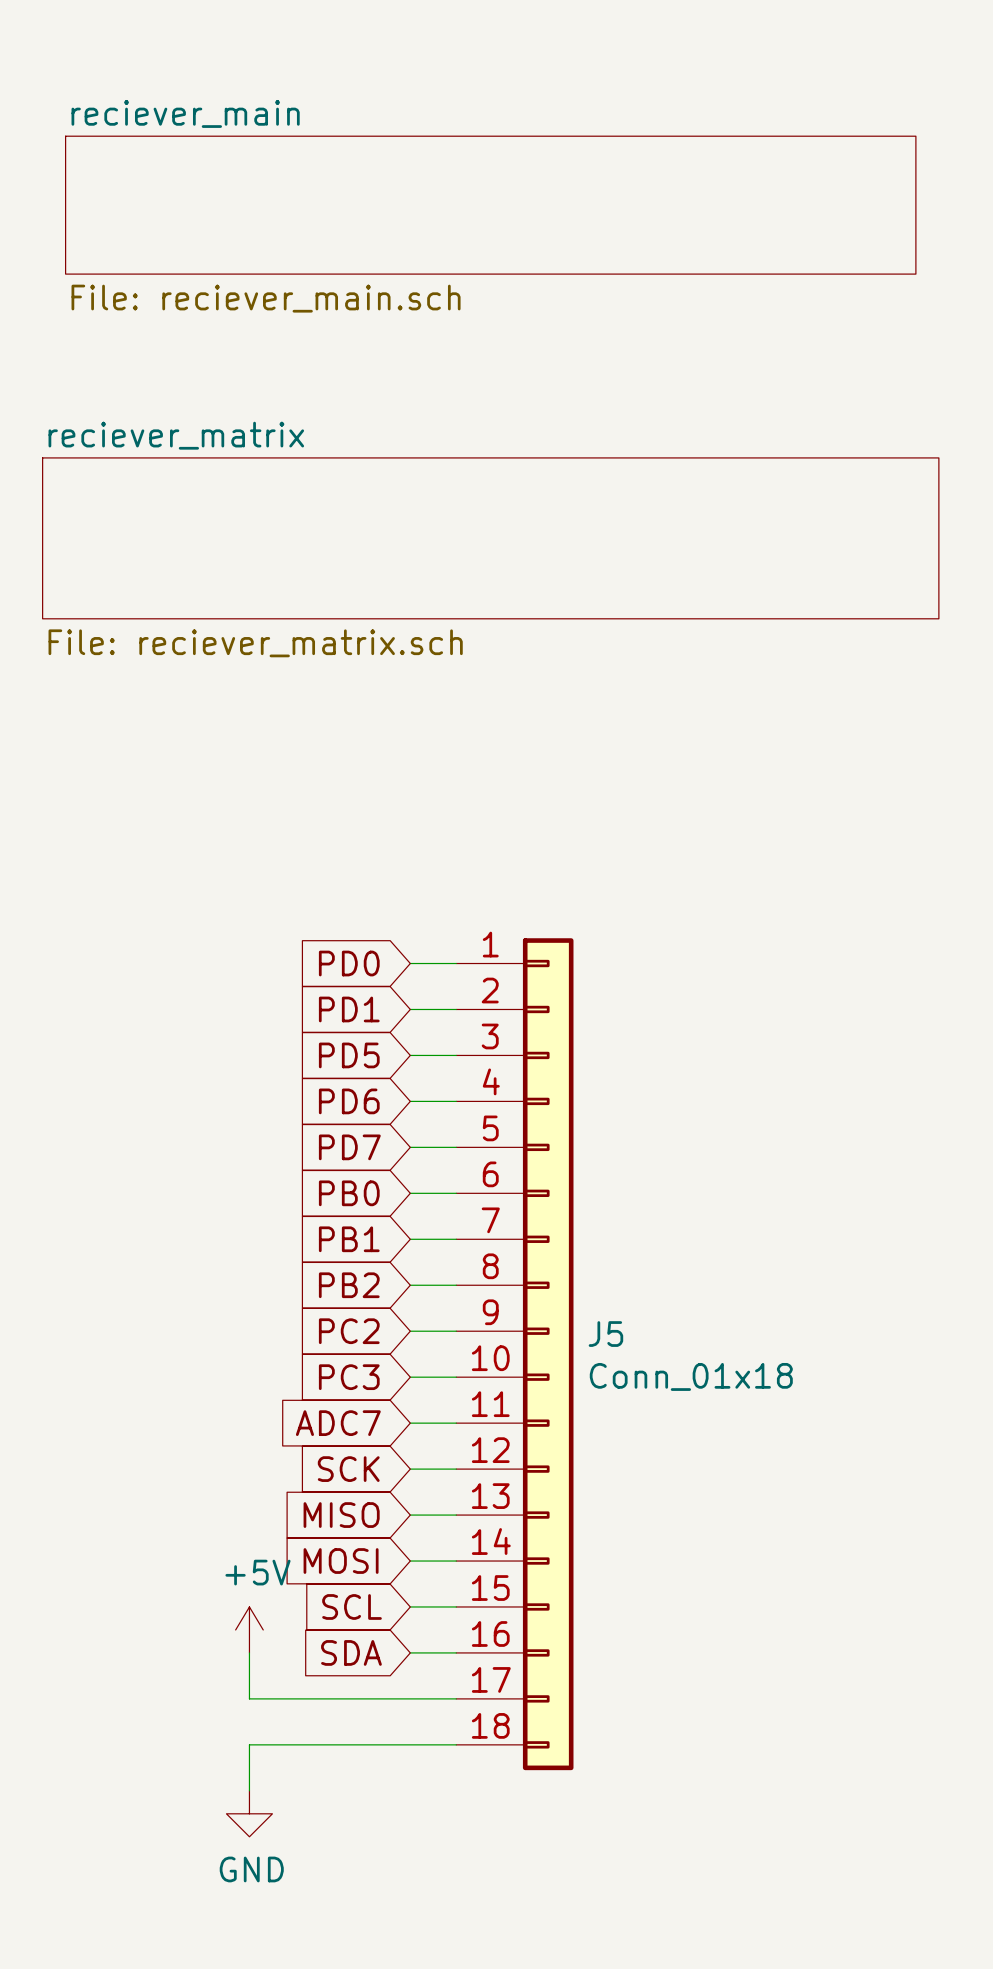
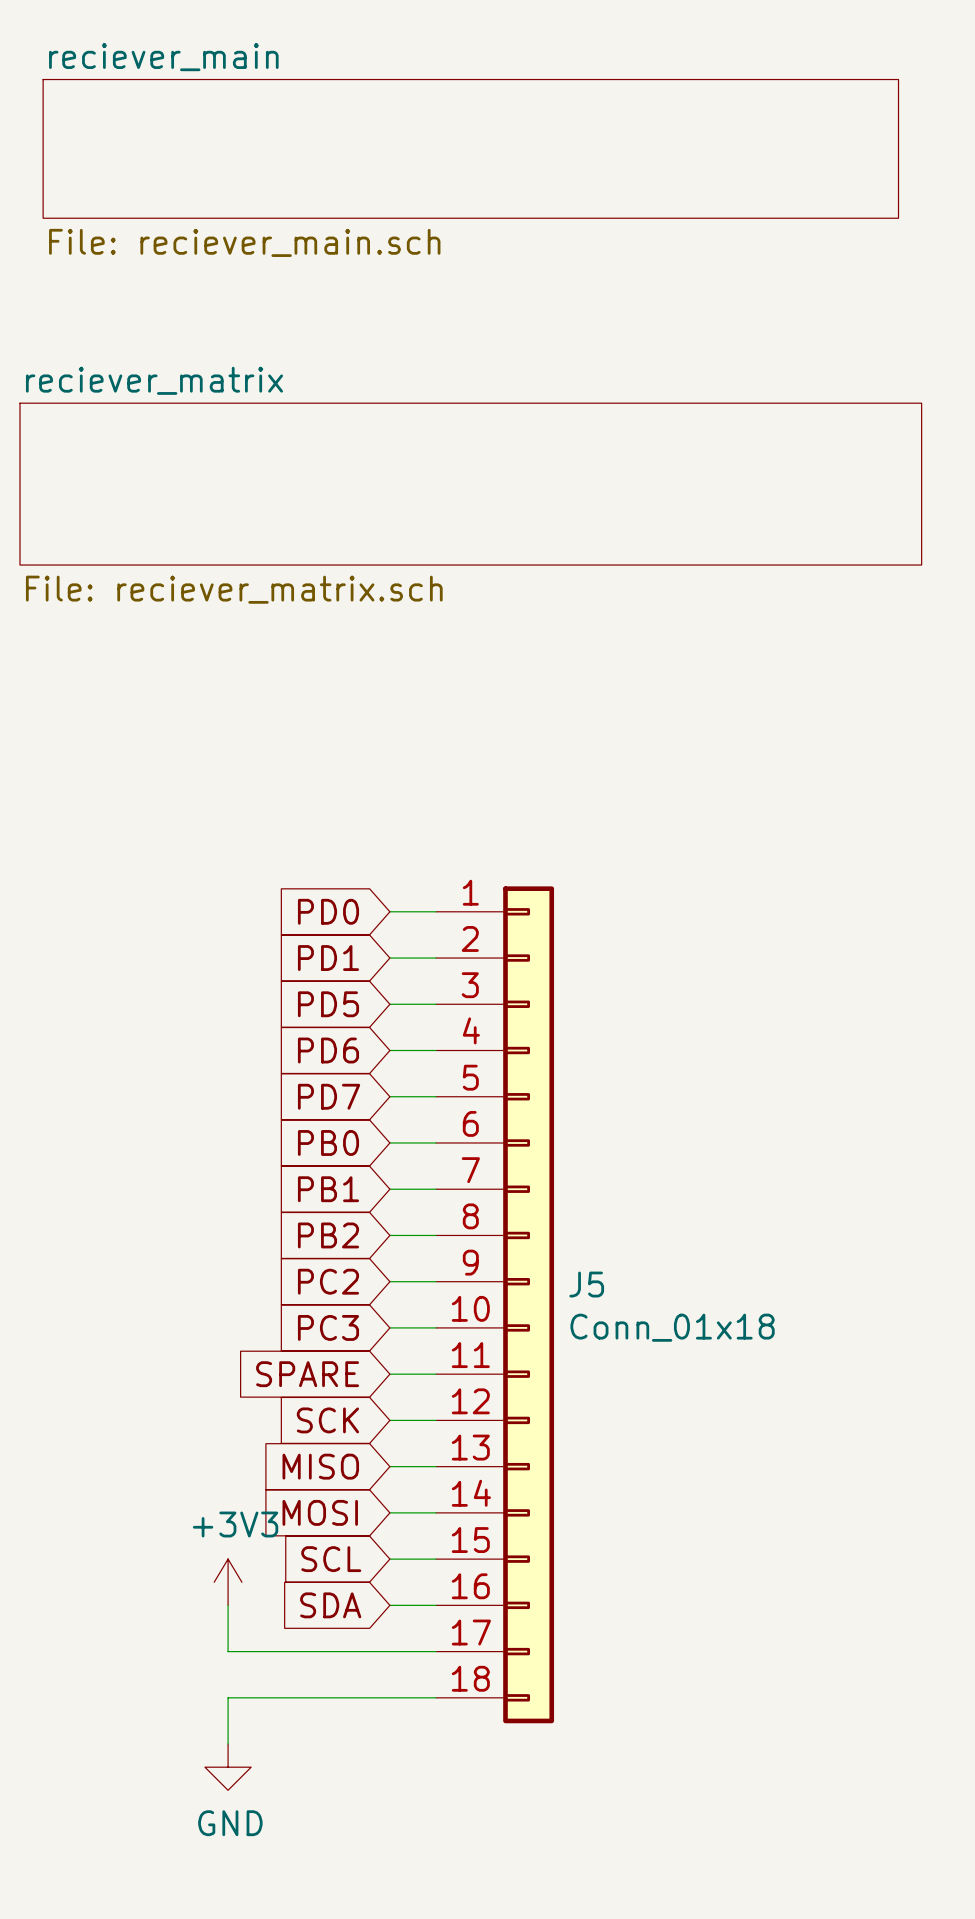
global label: ADC7 (338, 1423) -> SPARE (307, 1374)
power symbol: +5V (249, 1629) -> +3V3 (228, 1582)

